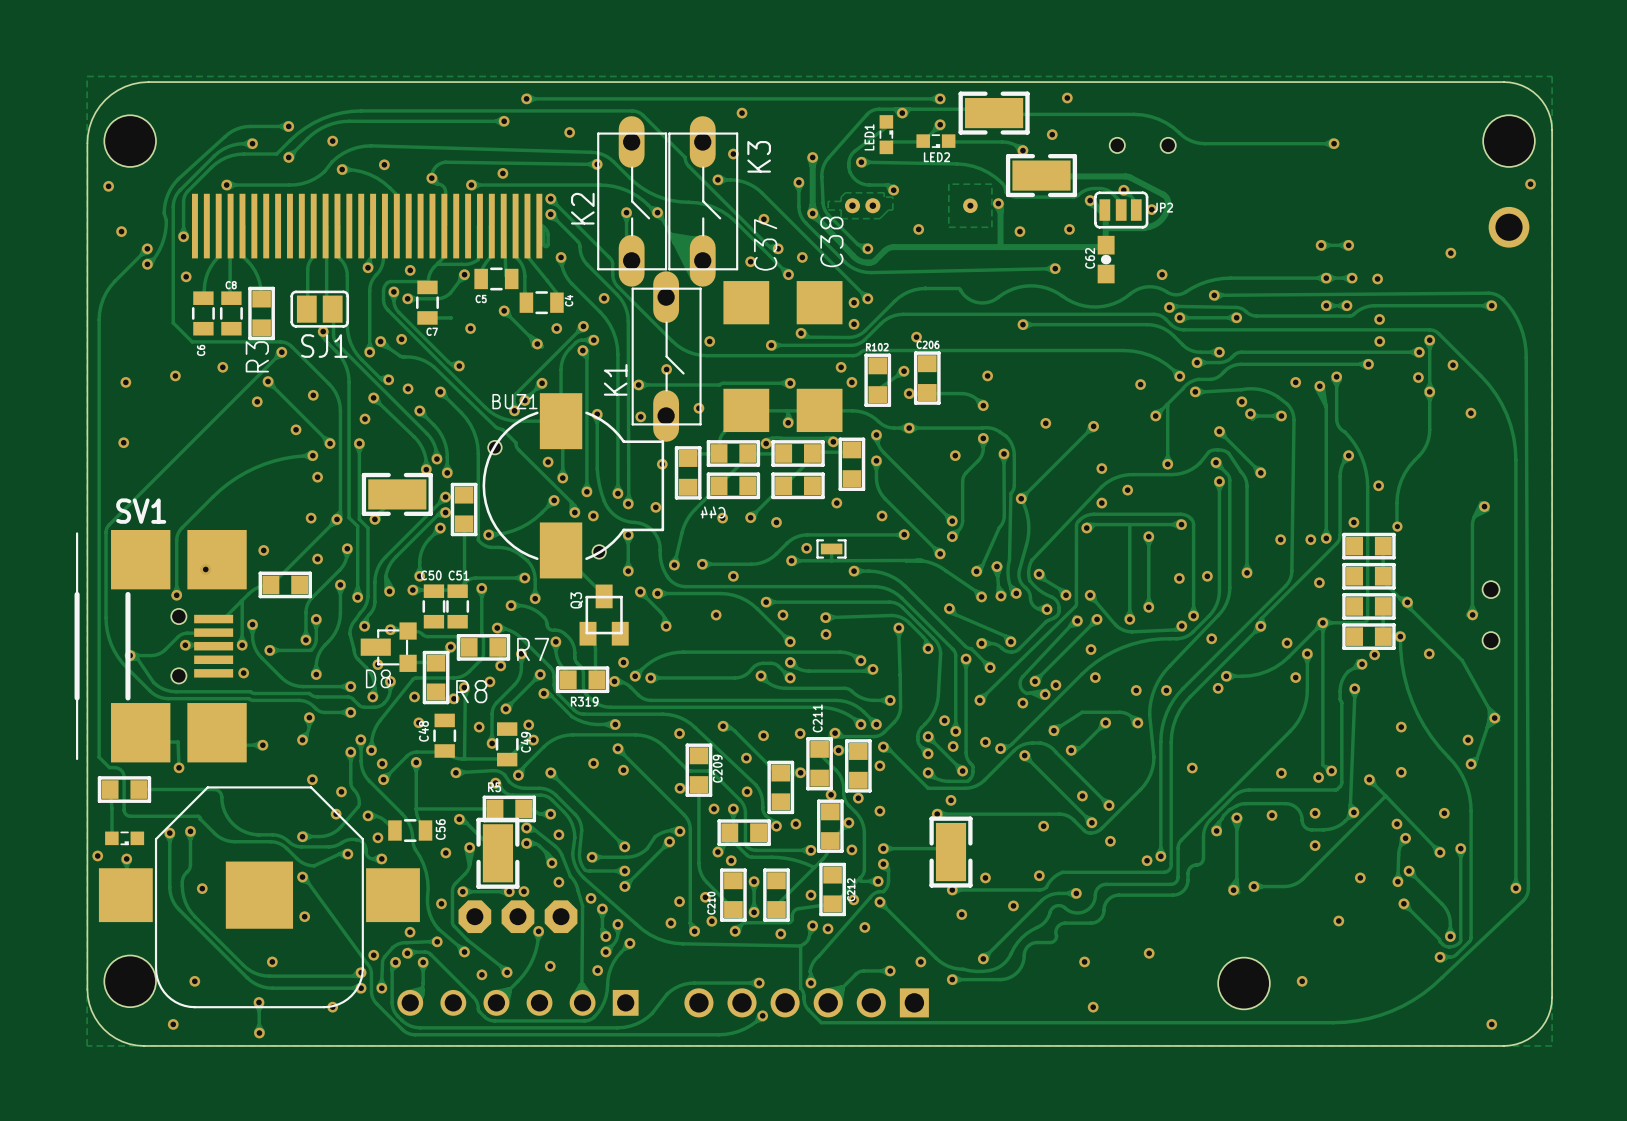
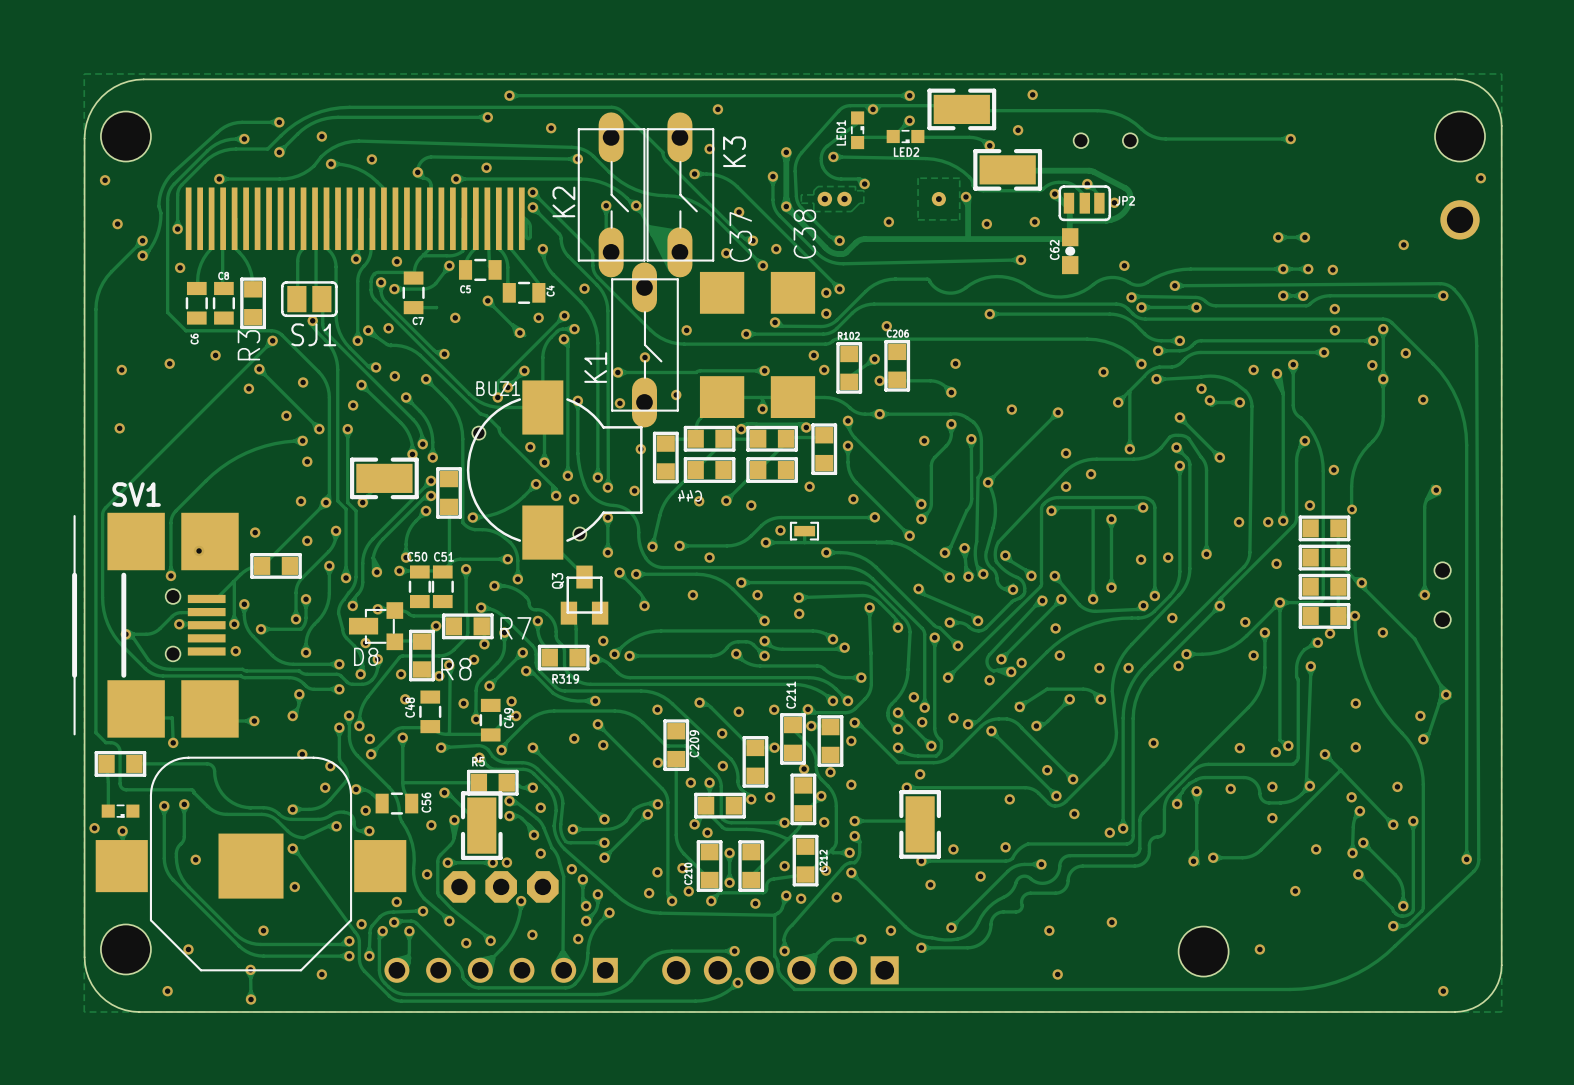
part rotation: 0° (259, 897) -> 180° (251, 864)

